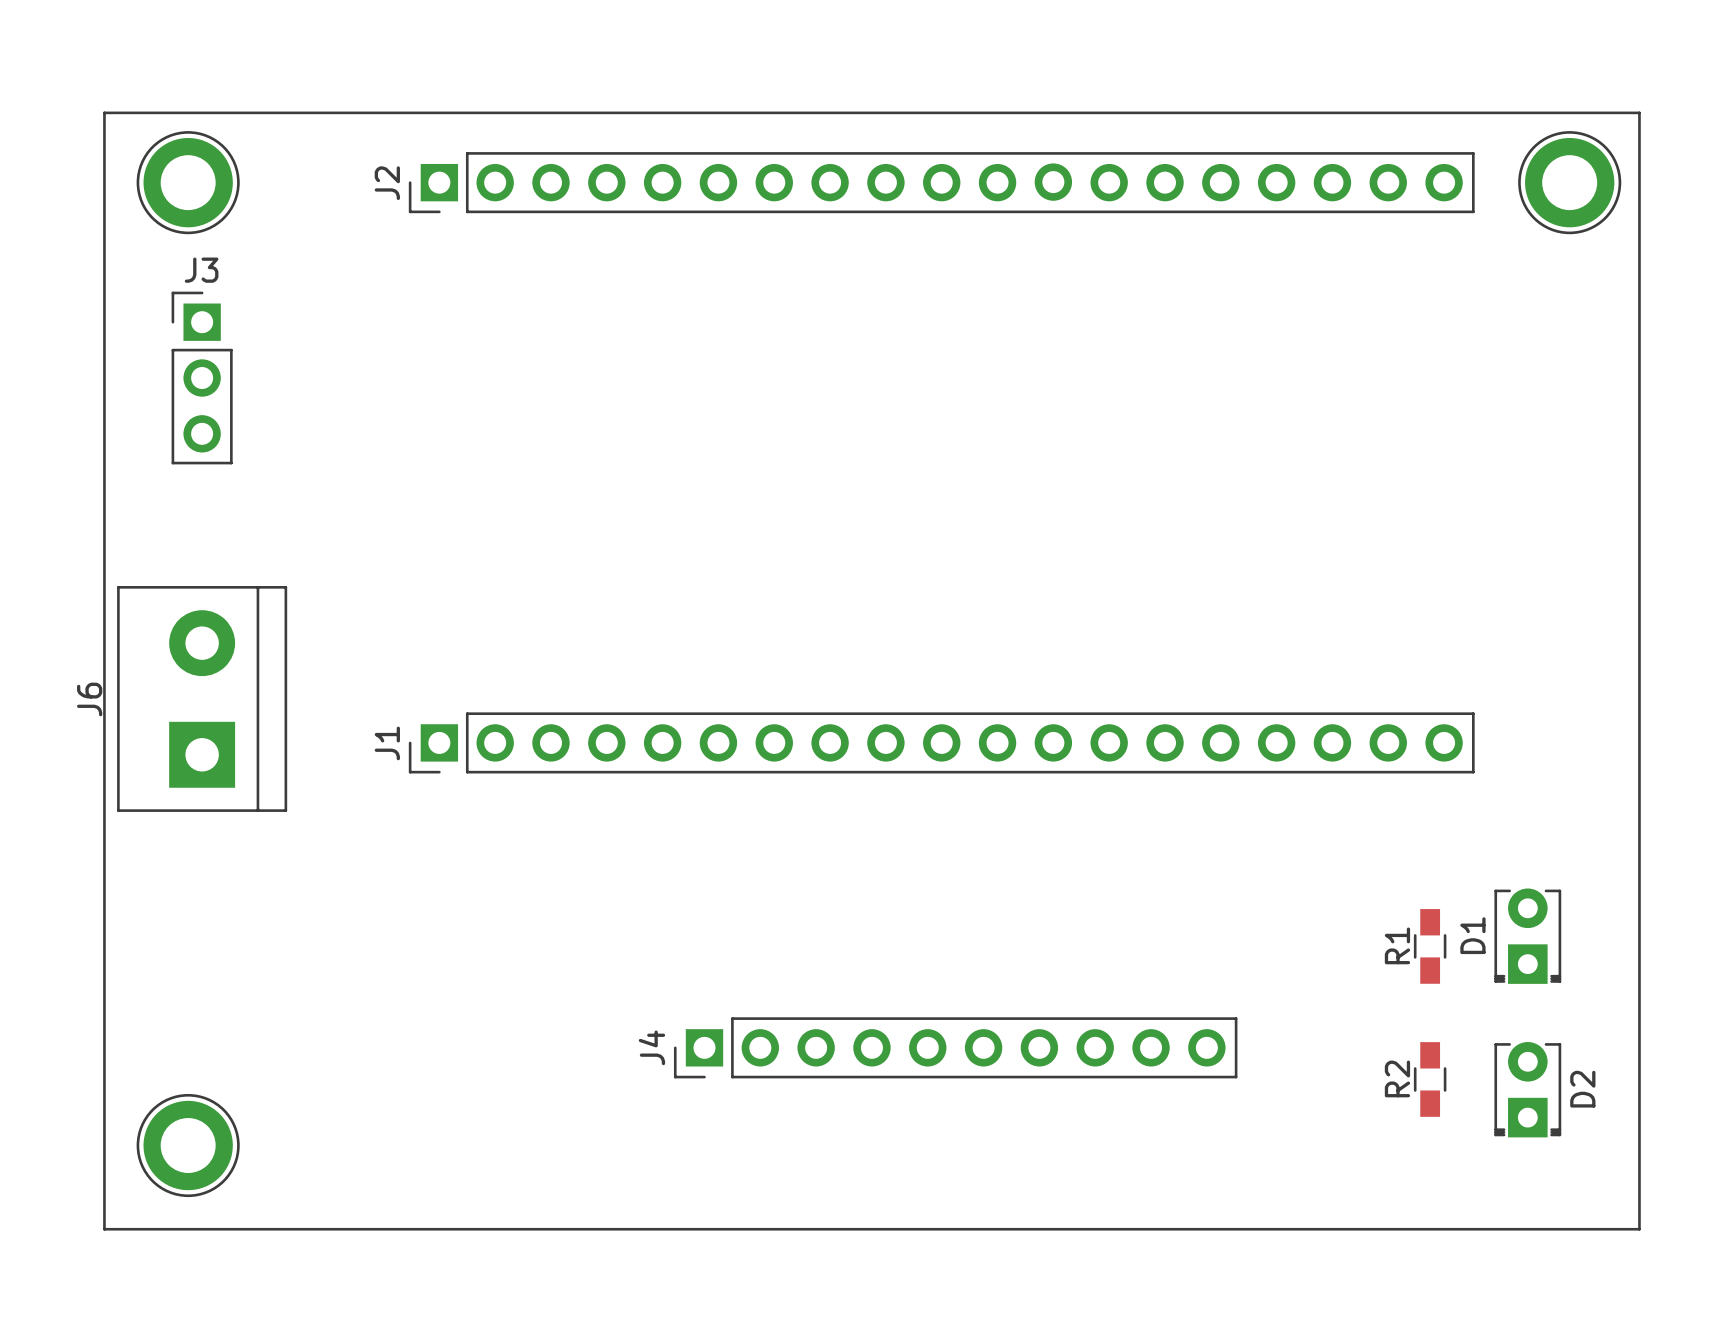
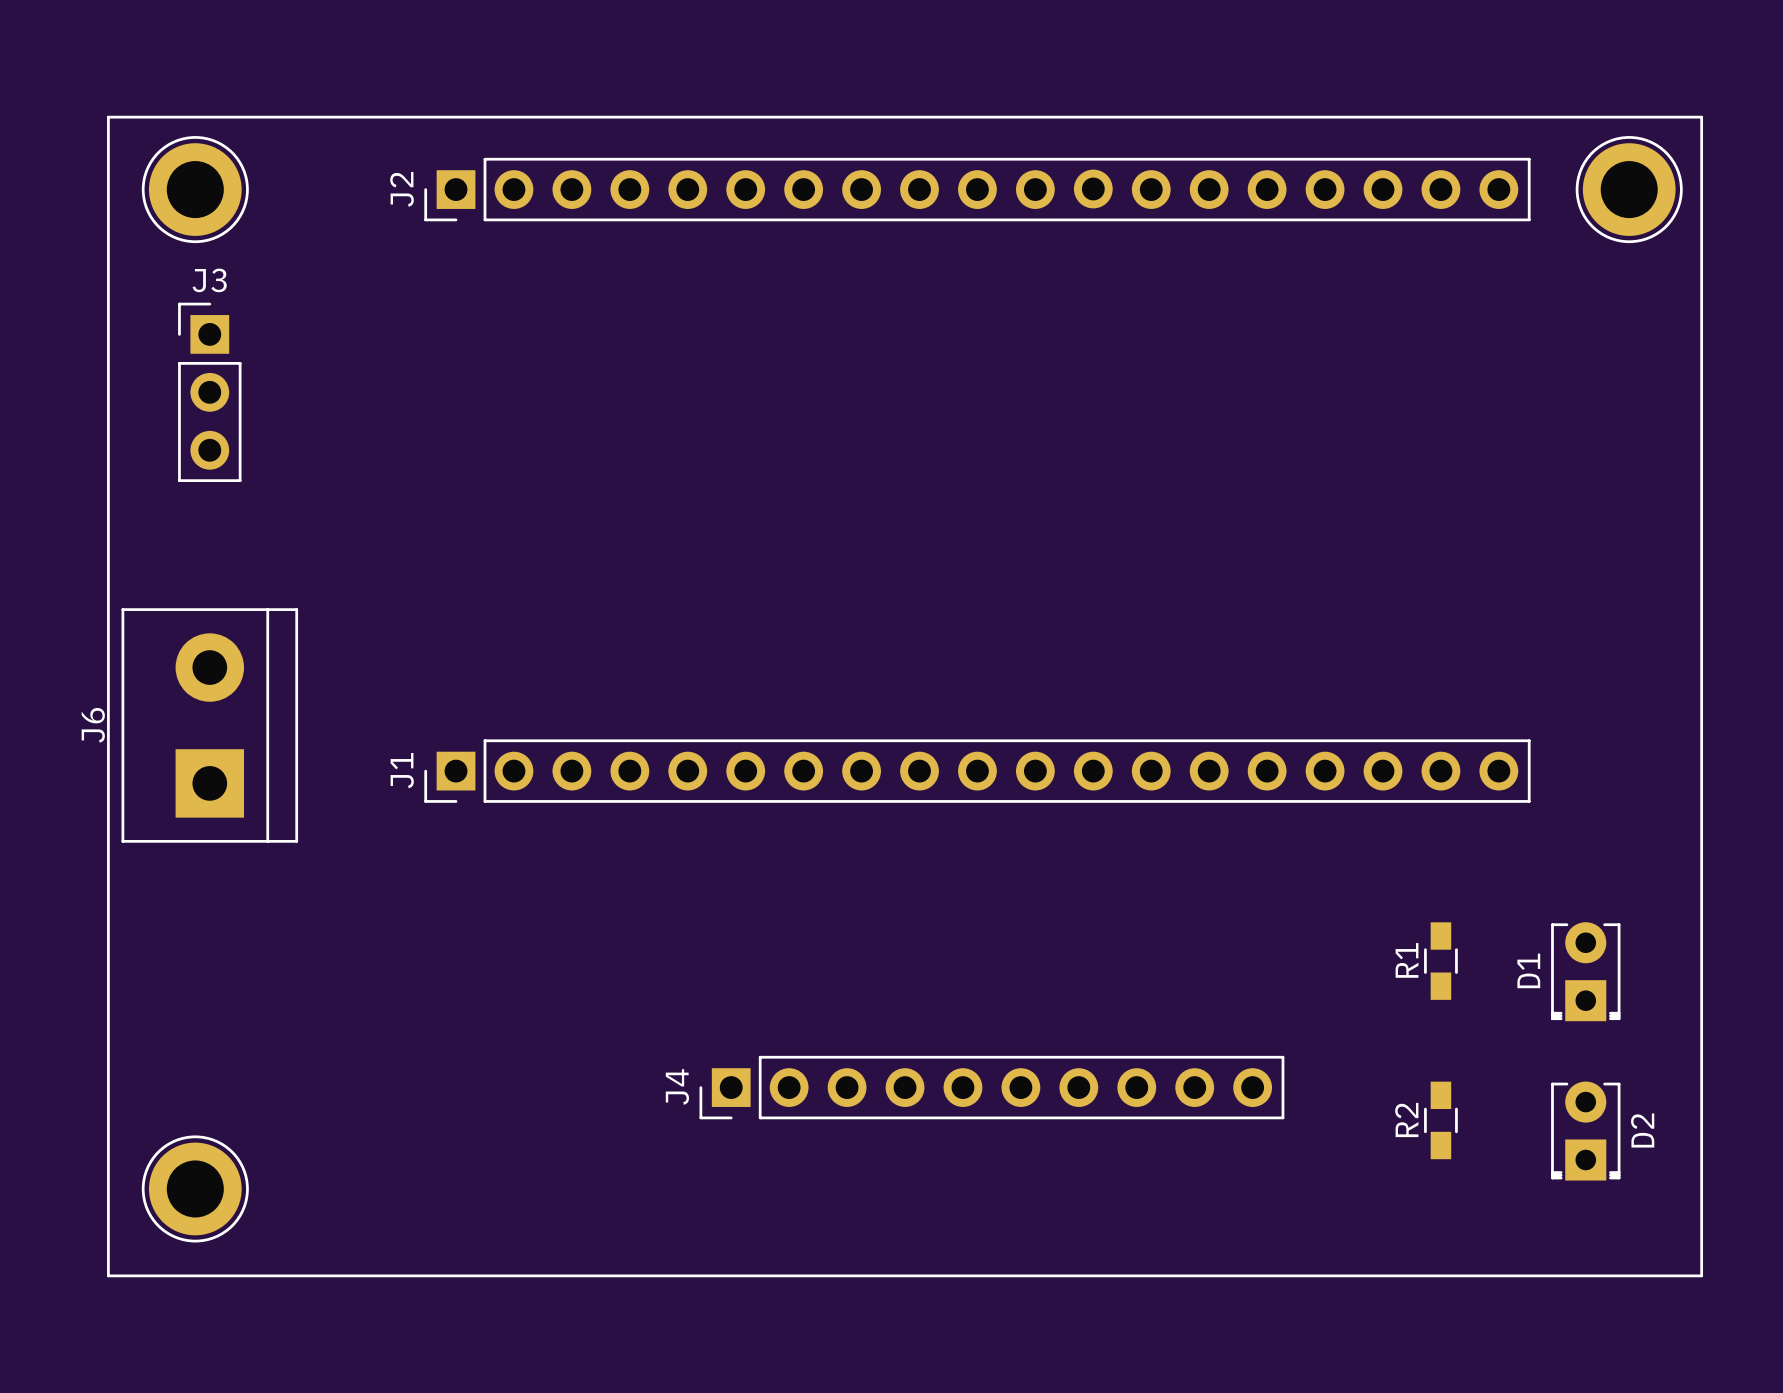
R1 position: (1430, 946) -> (1440, 961)
R2 position: (1430, 1079) -> (1440, 1120)

